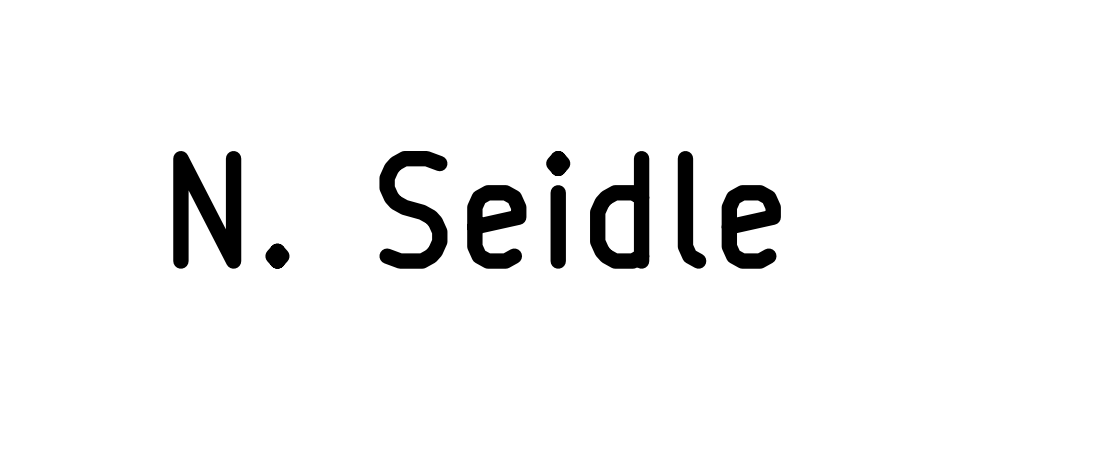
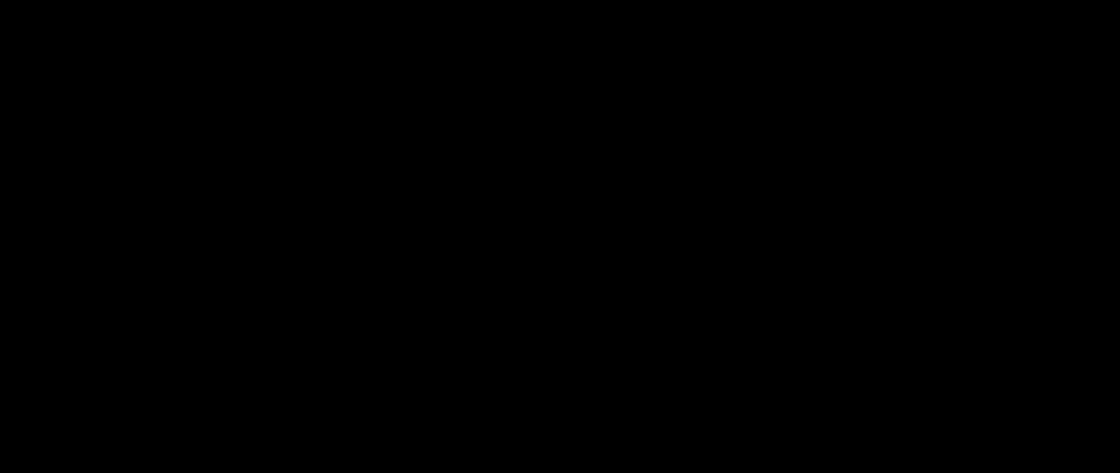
text: N. Seidle (477, 209) -> none

